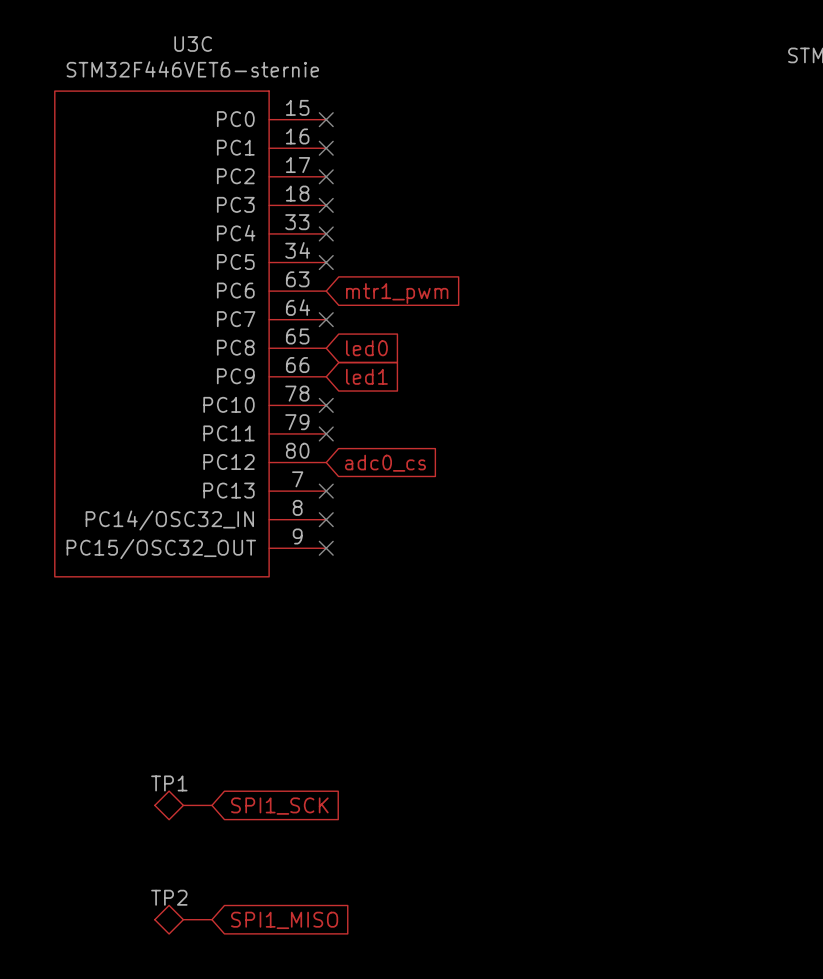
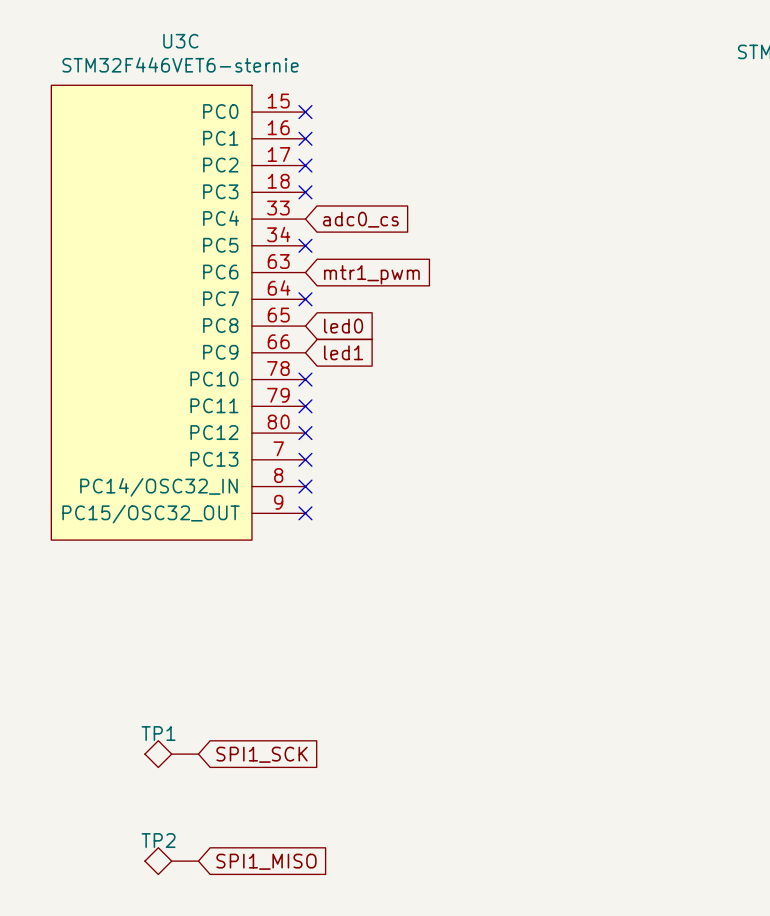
no-connect mark: (326, 233) -> none
no-connect mark: none -> (305, 433)
global label position: adc0_cs (385, 463) -> adc0_cs (360, 219)

